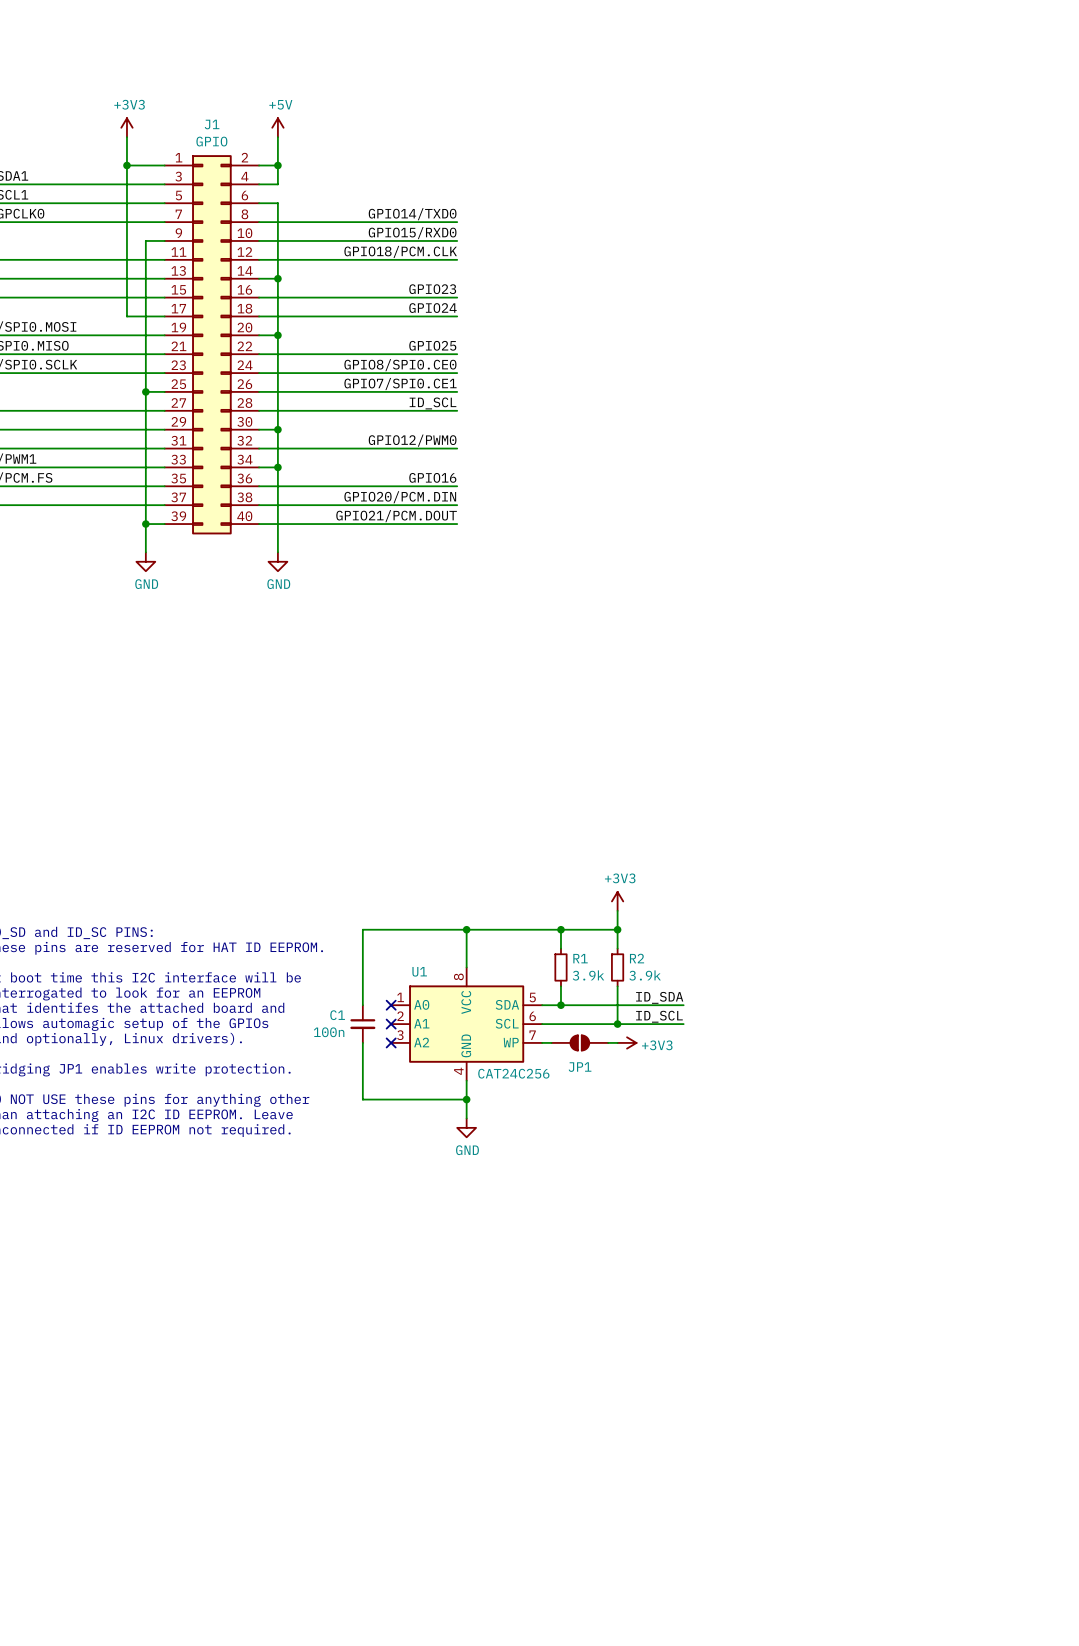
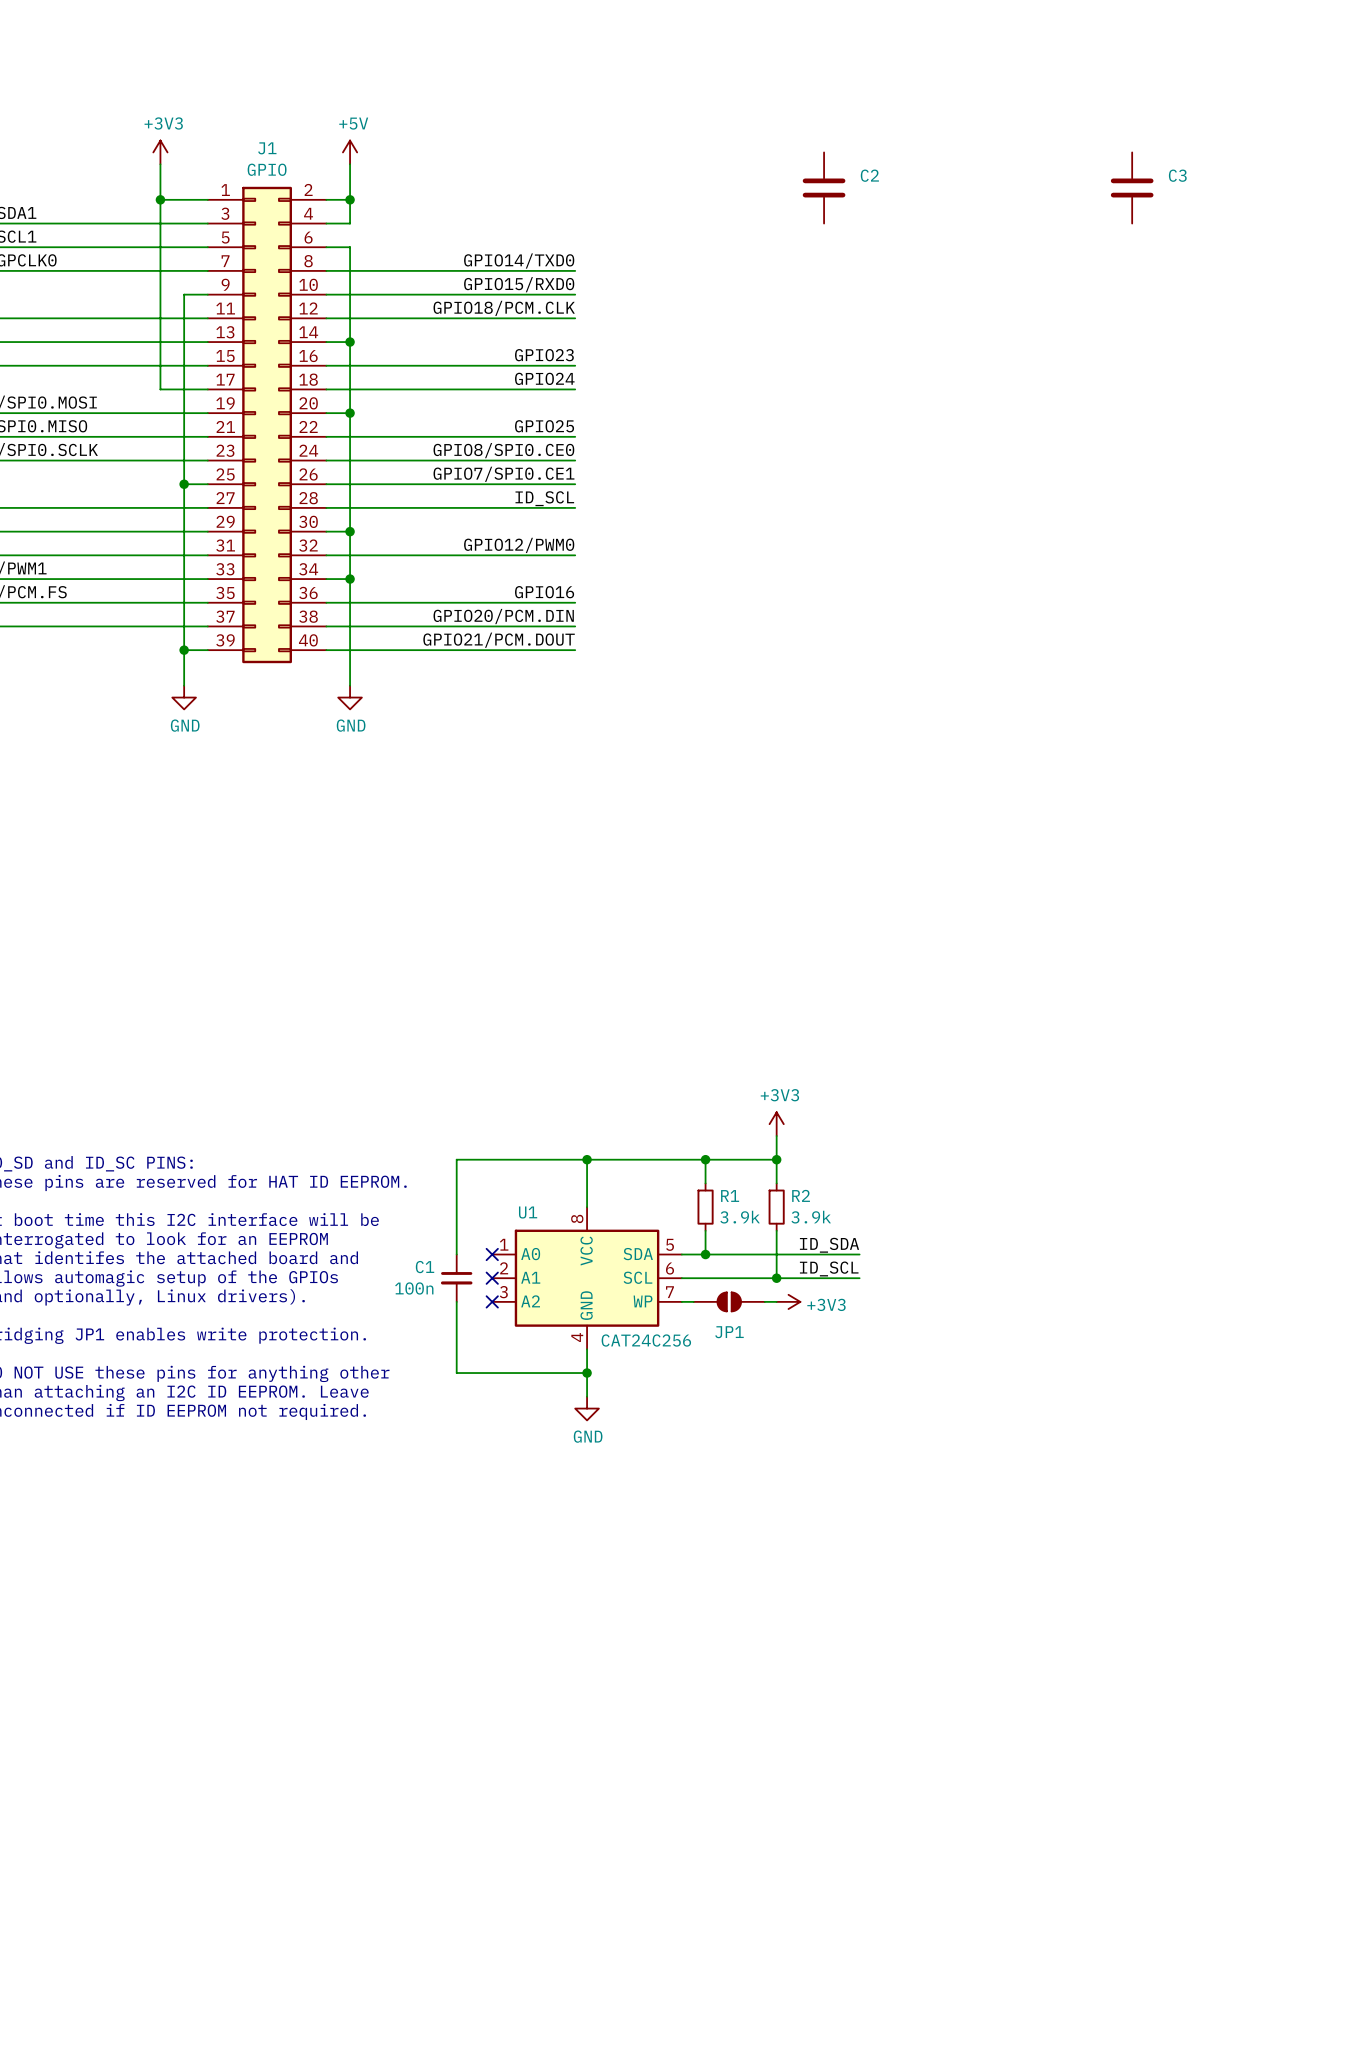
C2: none -> (824, 187)
C3: none -> (1132, 187)

